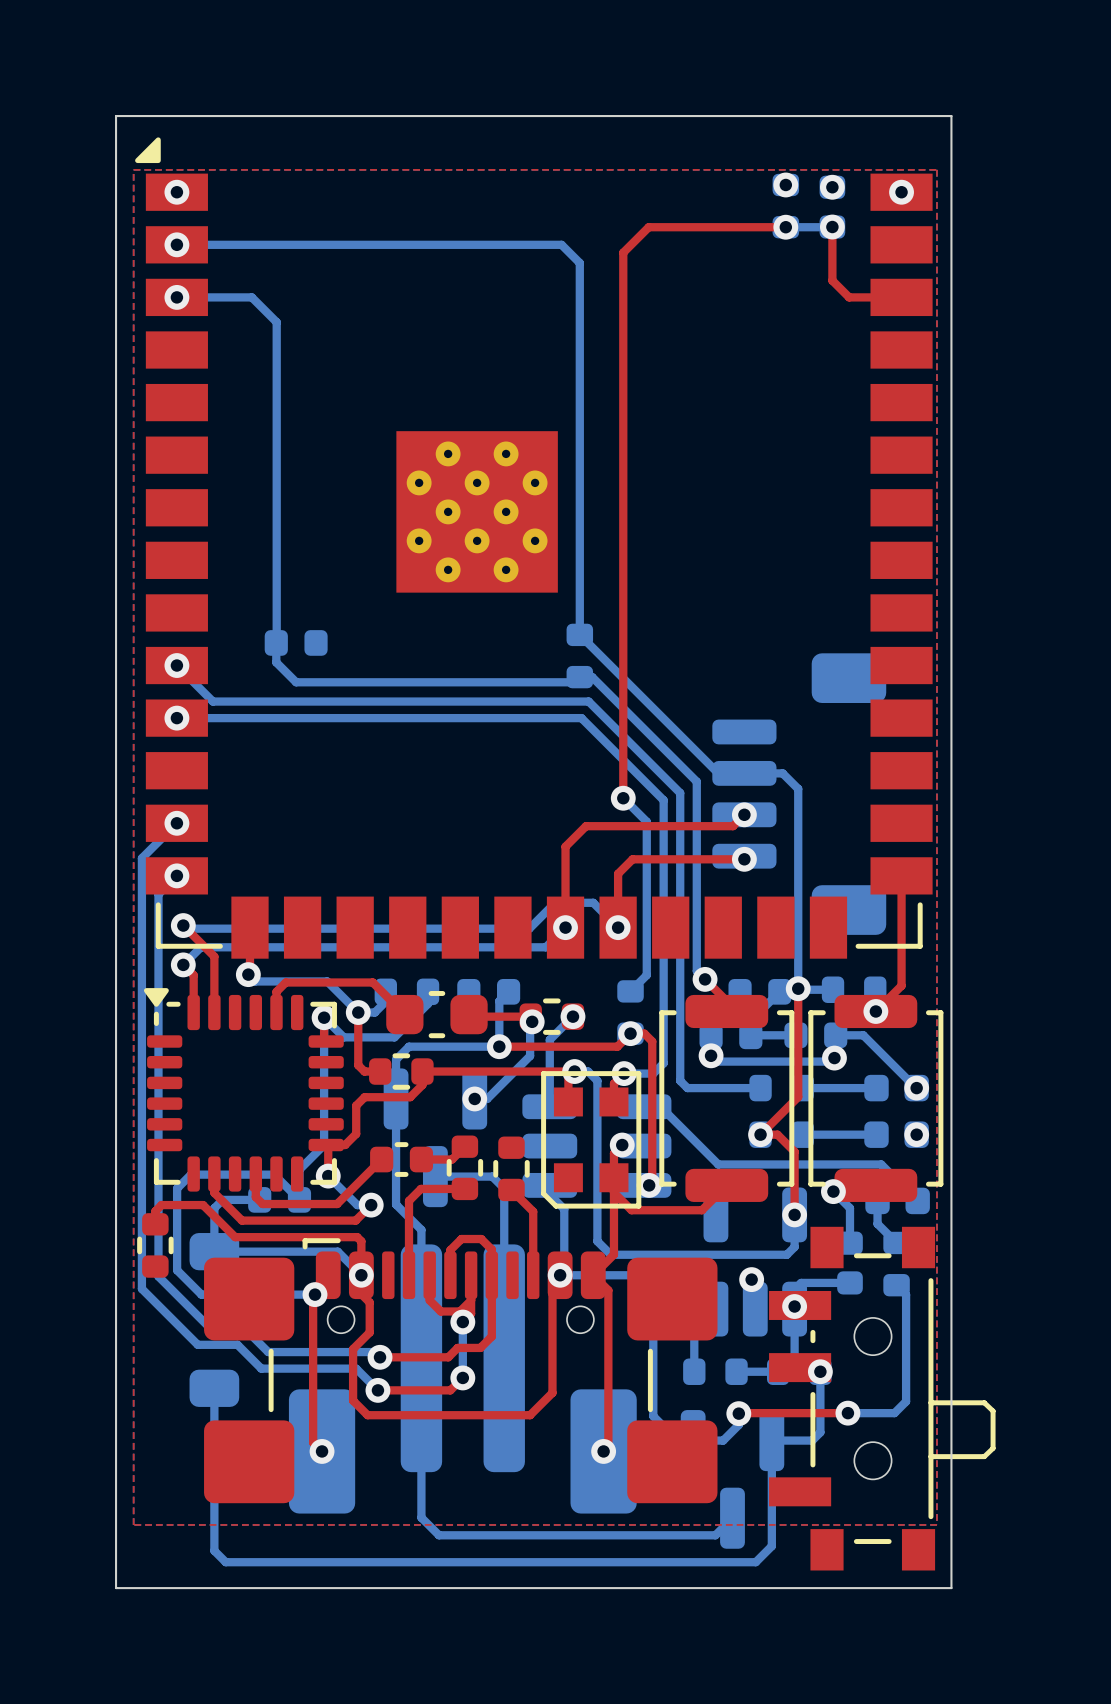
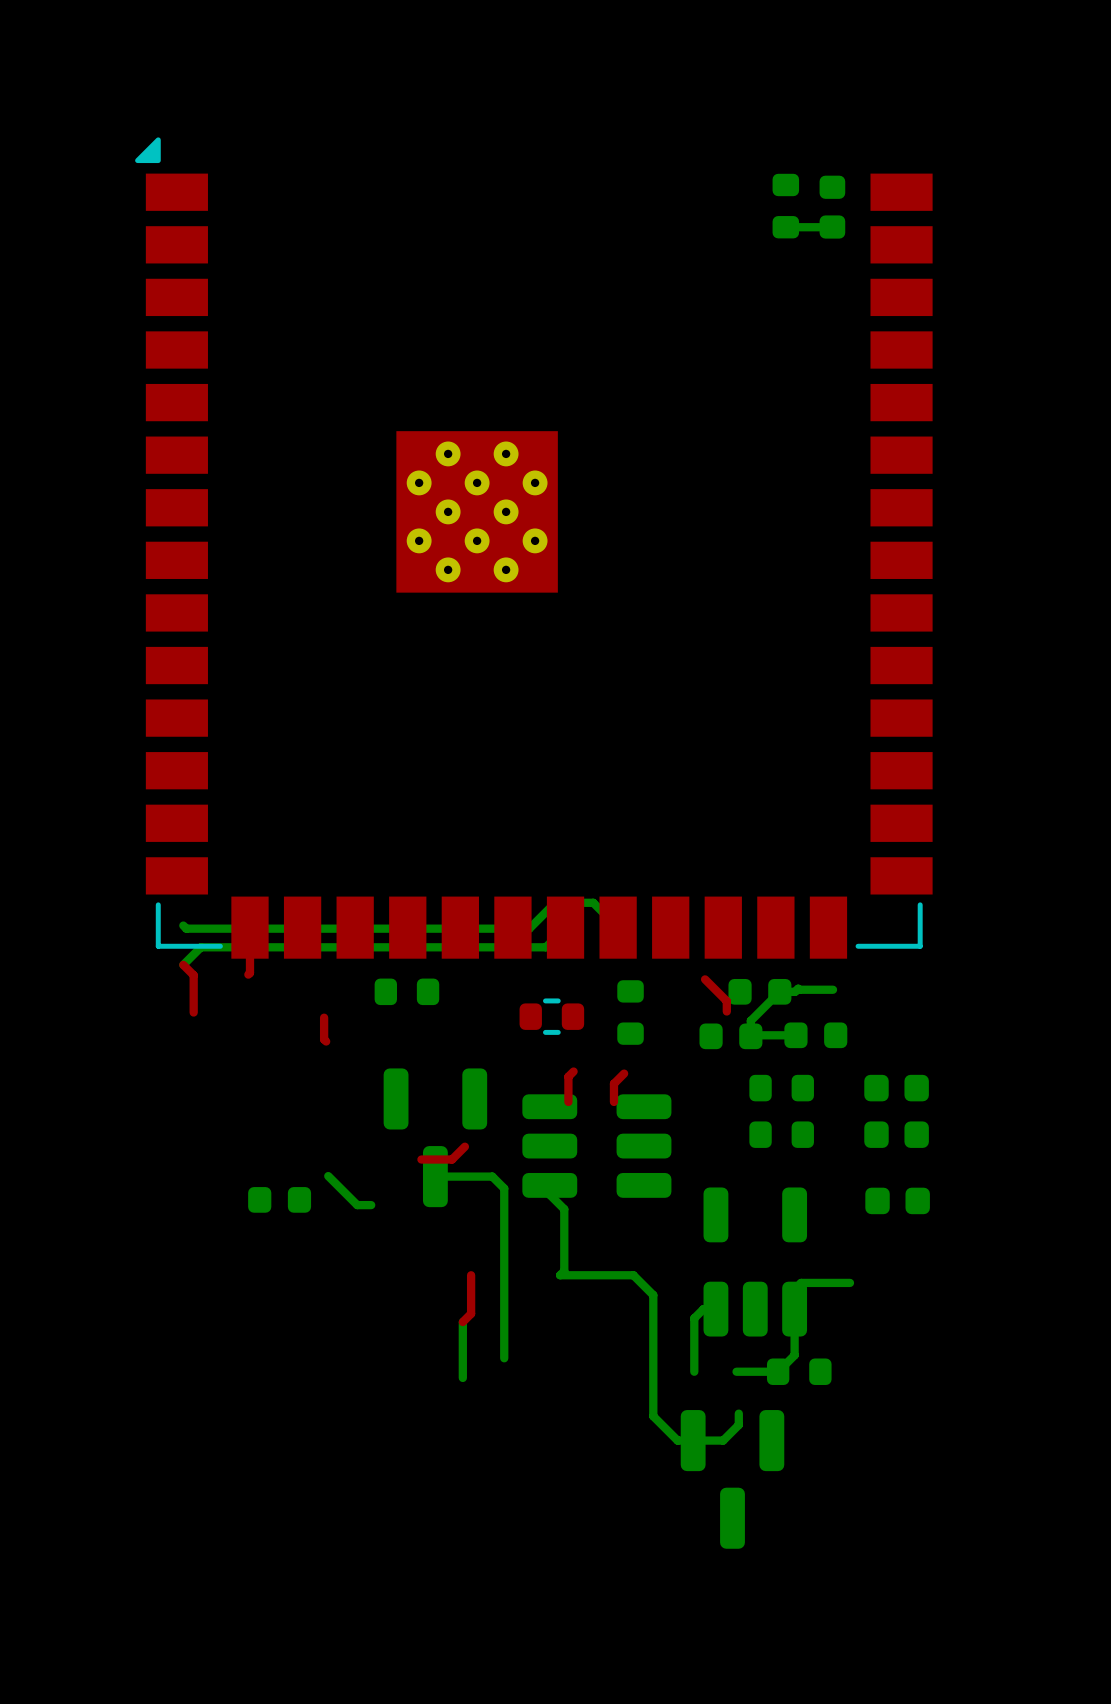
board edge: (116, 116) (116, 1588) (951, 1588) (951, 116) (116, 116) -> none
top zone outline: (133, 169) (936, 169) (936, 1524) (133, 1524) (133, 169) -> none
via: (785, 184) -> none
via: (832, 187) -> none
via: (176, 192) -> none
via: (901, 192) -> none
top track: (785, 227) (648, 227) (623, 252) (623, 798) -> none
via: (785, 227) -> none
top track: (832, 227) (832, 280) (849, 297) (901, 297) -> none
via: (832, 227) -> none
bottom track: (176, 244) (561, 244) (579, 263) (579, 634) (718, 773) (782, 773) (798, 788) (798, 988) -> none
via: (176, 244) -> none
bottom track: (176, 297) (251, 297) (276, 322) (276, 642) -> none
via: (176, 297) -> none
bottom track: (276, 642) (276, 662) (296, 682) (574, 682) (579, 677) (592, 677) (696, 781) (696, 971) (705, 979) -> none
part: (296, 642) -> none
part: (579, 656) -> none
bottom track: (176, 665) (212, 701) (588, 701) (680, 793) (680, 1080) (687, 1088) (760, 1088) -> none
via: (176, 665) -> none
bottom track: (176, 718) (581, 718) (663, 800) (663, 1063) (653, 1073) (624, 1073) -> none
via: (176, 718) -> none
part: (799, 794) -> none
bottom track: (623, 798) (646, 821) (646, 975) (630, 991) -> none
via: (623, 798) -> none
top track: (744, 814) (733, 826) (586, 826) (565, 846) (565, 927) -> none
via: (744, 814) -> none
bottom track: (176, 823) (141, 858) (141, 1288) (197, 1344) (237, 1344) (261, 1368) (356, 1368) (377, 1390) -> none
via: (176, 823) -> none
top track: (744, 859) (632, 859) (618, 873) (618, 927) -> none
via: (744, 859) -> none
bottom track: (176, 875) (158, 894) (158, 1276) (210, 1328) (244, 1328) (268, 1352) (374, 1352) (380, 1357) -> none
via: (176, 875) -> none
top track: (901, 875) (901, 985) (875, 1011) -> none
top track: (183, 925) (214, 956) (214, 1012) -> none
via: (183, 925) -> none
via: (565, 927) -> none
via: (618, 927) -> none
via: (183, 964) -> none
bottom track: (248, 974) (255, 981) (327, 981) (358, 1012) (374, 1012) (385, 1001) (385, 991) -> none
via: (248, 974) -> none
via: (705, 979) -> none
top track: (798, 988) (798, 1096) (760, 1134) (777, 1134) (794, 1151) (794, 1214) -> none
via: (798, 988) -> none
part: (854, 989) -> none
bottom track: (428, 991) (428, 1003) (394, 1037) (343, 1037) (324, 1017) (324, 1145) (299, 1169) (299, 1199) (274, 1174) (190, 1174) (177, 1188) (177, 1270) (201, 1294) (315, 1294) -> none
part: (488, 991) -> none
bottom track: (508, 991) (499, 1001) (499, 1046) (409, 1046) (396, 1059) (396, 1204) (421, 1229) (421, 1517) (439, 1535) (715, 1535) (732, 1518) -> none
bottom track: (740, 991) (711, 1020) (711, 1055) (716, 1061) (830, 1061) (835, 1056) (835, 1035) (863, 1035) (916, 1088) -> none
via: (875, 1011) -> none
top track: (276, 1012) (276, 991) (285, 982) (372, 982) (404, 1014) -> none
top track: (358, 1012) (358, 1065) (364, 1071) (380, 1071) -> none
via: (358, 1012) -> none
part: (436, 1014) -> none
top track: (469, 1014) (471, 1016) (530, 1016) (532, 1021) -> none
bottom track: (572, 1016) (549, 1039) (549, 1106) -> none
via: (572, 1016) -> none
via: (324, 1017) -> none
bottom track: (532, 1021) (530, 1023) (530, 1056) (487, 1098) (474, 1098) -> none
via: (532, 1021) -> none
via: (630, 1033) -> none
top track: (499, 1046) (617, 1046) (630, 1033) (644, 1033) (652, 1041) (652, 1182) (649, 1185) -> none
via: (499, 1046) -> none
via: (711, 1055) -> none
via: (834, 1058) -> none
part: (401, 1071) -> none
top track: (574, 1071) (422, 1071) (422, 1084) (410, 1097) (364, 1097) (356, 1105) (356, 1133) (345, 1145) (326, 1145) (328, 1147) (328, 1176) -> none
bottom track: (574, 1071) (588, 1071) (597, 1080) (597, 1241) (610, 1254) (786, 1254) (794, 1246) (794, 1214) -> none
via: (574, 1071) -> none
via: (624, 1073) -> none
bottom track: (802, 1088) (876, 1088) -> none
via: (916, 1088) -> none
part: (243, 1089) -> none
via: (474, 1098) -> none
part: (726, 1098) -> none
part: (875, 1098) -> none
bottom track: (643, 1106) (660, 1106) (718, 1164) (881, 1164) (917, 1200) -> none
via: (760, 1134) -> none
bottom track: (802, 1134) (876, 1134) -> none
via: (916, 1134) -> none
part: (591, 1139) -> none
top track: (622, 1145) (613, 1153) (613, 1254) (593, 1275) (608, 1290) (608, 1446) (603, 1451) -> none
via: (622, 1145) -> none
top track: (381, 1159) (337, 1204) (262, 1204) (255, 1197) (255, 1174) -> none
part: (401, 1159) -> none
part: (464, 1167) -> none
part: (511, 1168) -> none
top track: (214, 1174) (214, 1192) (242, 1220) (355, 1220) (371, 1205) -> none
via: (328, 1176) -> none
via: (649, 1185) -> none
top track: (726, 1185) (701, 1210) (631, 1210) (613, 1192) -> none
top track: (464, 1188) (421, 1188) (409, 1200) (409, 1275) -> none
top track: (511, 1189) (533, 1211) (533, 1275) -> none
bottom track: (833, 1191) (849, 1208) (849, 1243) -> none
via: (833, 1191) -> none
bottom track: (259, 1199) (222, 1199) (214, 1208) (214, 1251) (337, 1251) (361, 1275) -> none
bottom track: (877, 1200) (877, 1223) (896, 1242) -> none
via: (371, 1205) -> none
via: (794, 1214) -> none
top track: (155, 1224) (155, 1211) (161, 1205) (203, 1205) (235, 1237) (357, 1237) (361, 1241) (361, 1294) (369, 1302) (369, 1332) (353, 1349) (353, 1400) (367, 1415) (530, 1415) (552, 1392) (552, 1282) (560, 1275) -> none
part: (155, 1245) -> none
part: (849, 1263) -> none
part: (896, 1264) -> none
top track: (328, 1275) (313, 1290) (313, 1442) (322, 1451) -> none
via: (361, 1275) -> none
top track: (429, 1275) (429, 1300) (440, 1311) (460, 1311) (471, 1300) -> none
top track: (450, 1275) (450, 1250) (461, 1239) (481, 1239) (491, 1249) (491, 1336) (480, 1347) (457, 1347) (448, 1357) (380, 1357) -> none
via: (560, 1275) -> none
via: (751, 1279) -> none
bottom track: (896, 1285) (906, 1294) (906, 1401) (894, 1413) (847, 1413) -> none
via: (315, 1294) -> none
via: (794, 1306) -> none
part: (214, 1319) -> none
via: (462, 1322) -> none
via: (380, 1357) -> none
part: (460, 1370) -> none
part: (715, 1371) -> none
bottom track: (820, 1371) (820, 1432) (812, 1440) (771, 1440) (771, 1546) (755, 1562) (225, 1562) (214, 1550) (214, 1388) -> none
via: (820, 1371) -> none
top track: (462, 1377) (450, 1390) (377, 1390) -> none
via: (462, 1377) -> none
part: (462, 1378) -> none
via: (377, 1390) -> none
part: (882, 1398) -> none
via: (738, 1413) -> none
top track: (739, 1413) (847, 1413) -> none
via: (847, 1413) -> none
via: (322, 1451) -> none
via: (603, 1451) -> none

